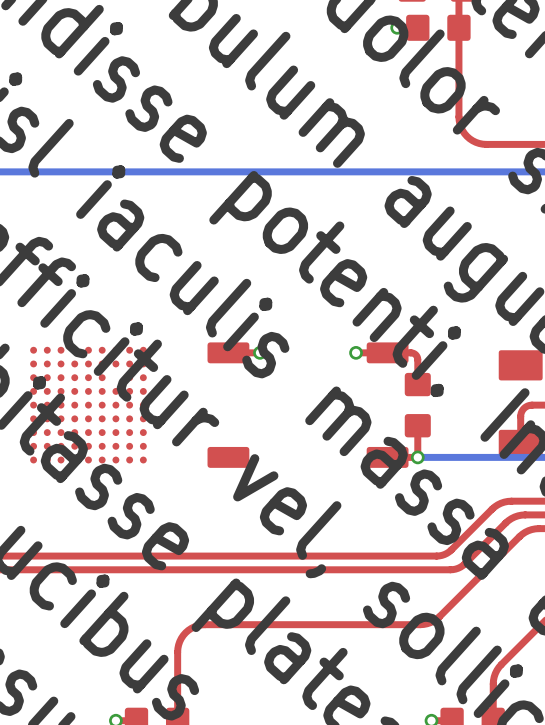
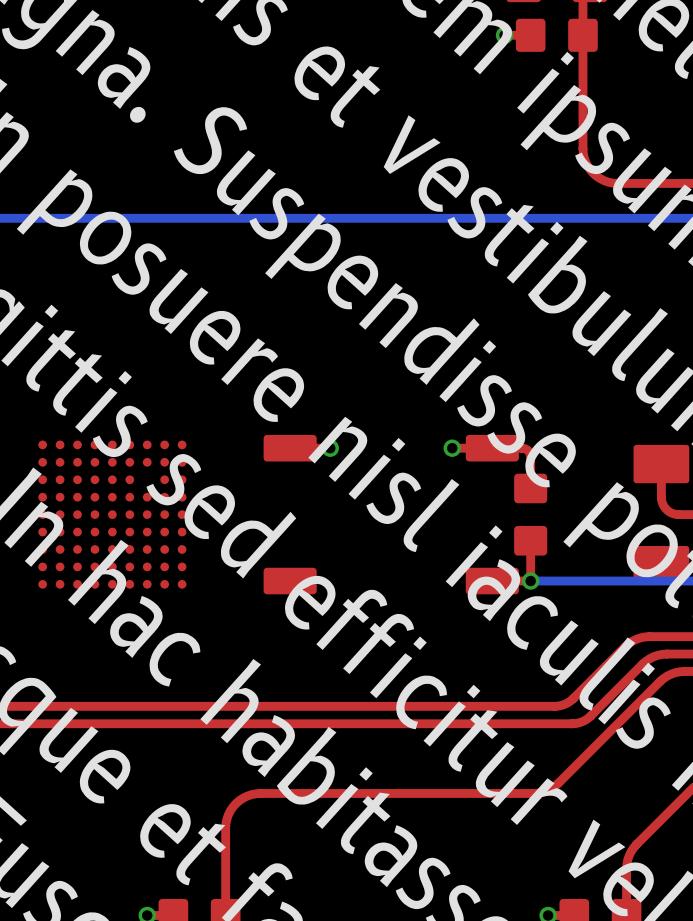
top track: (534, 405) (526, 406) (521, 412) (520, 444) -> (678, 514) (670, 512) (662, 503) (661, 464)

